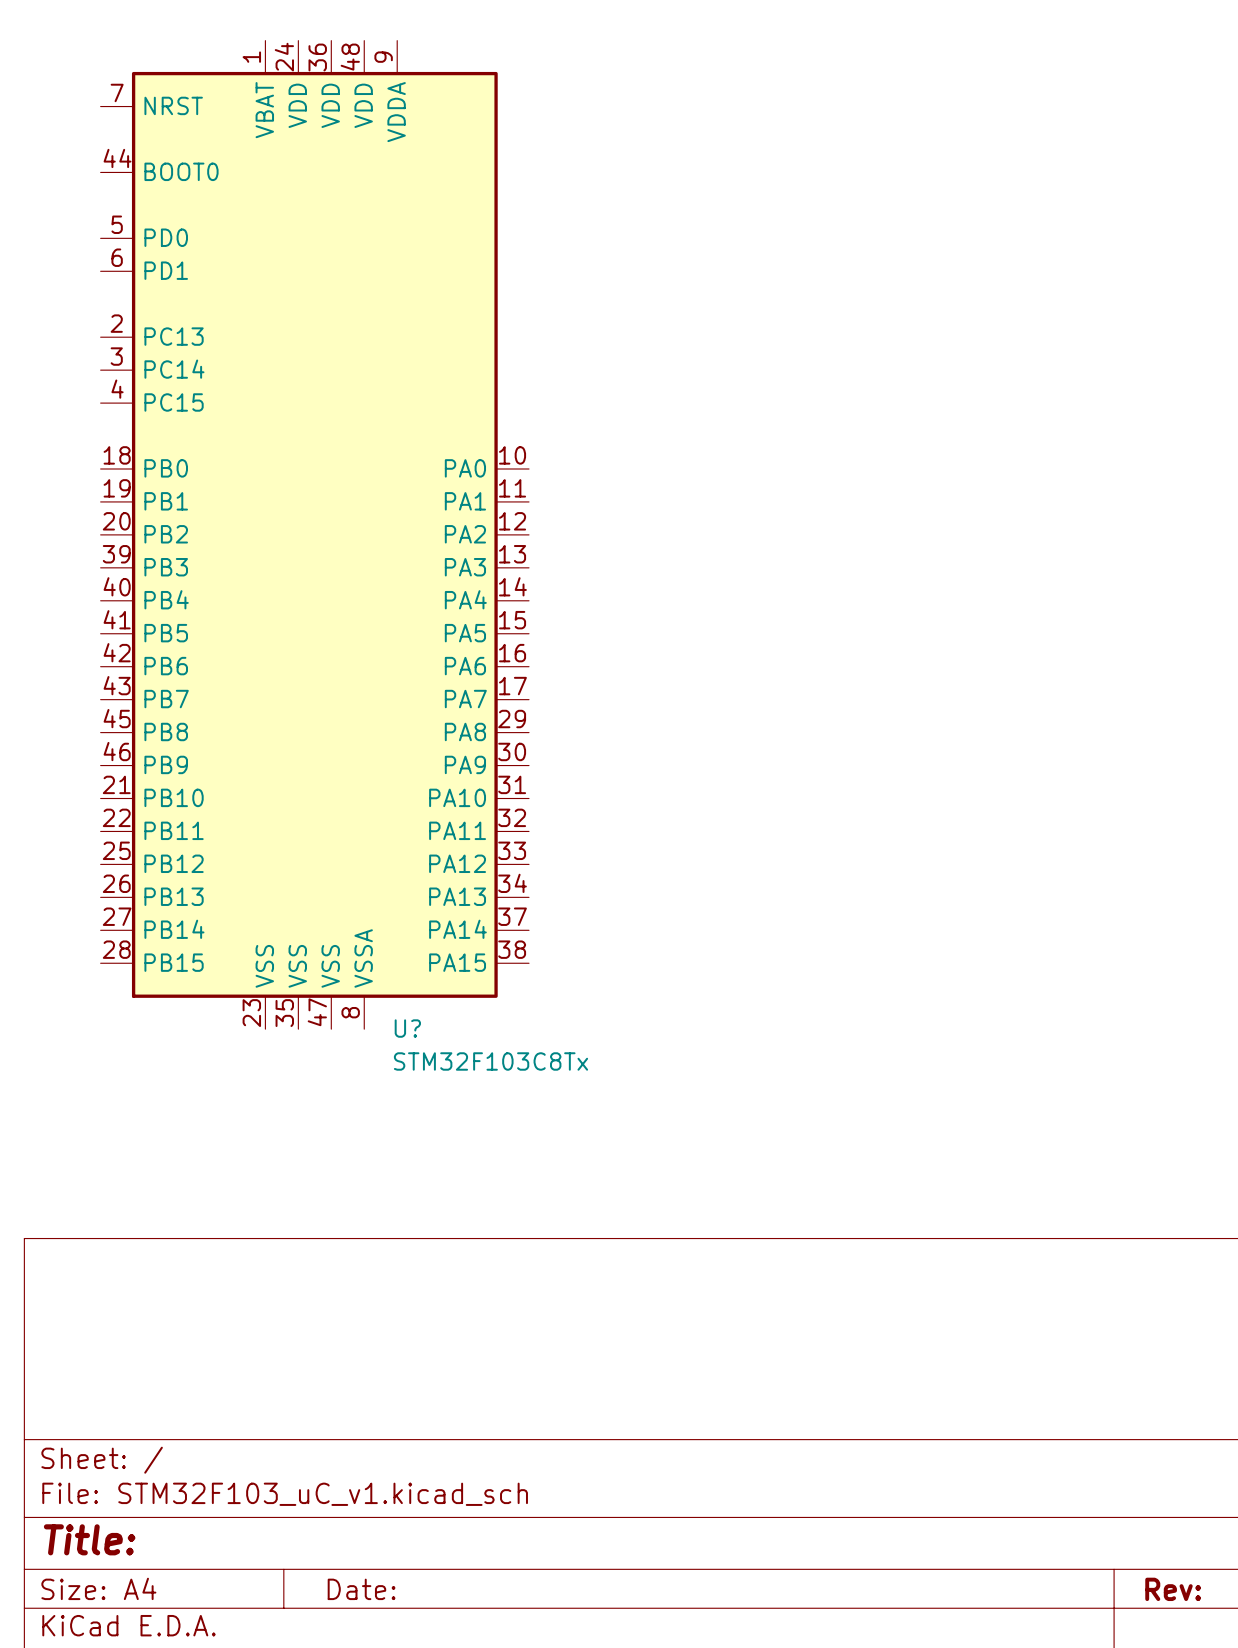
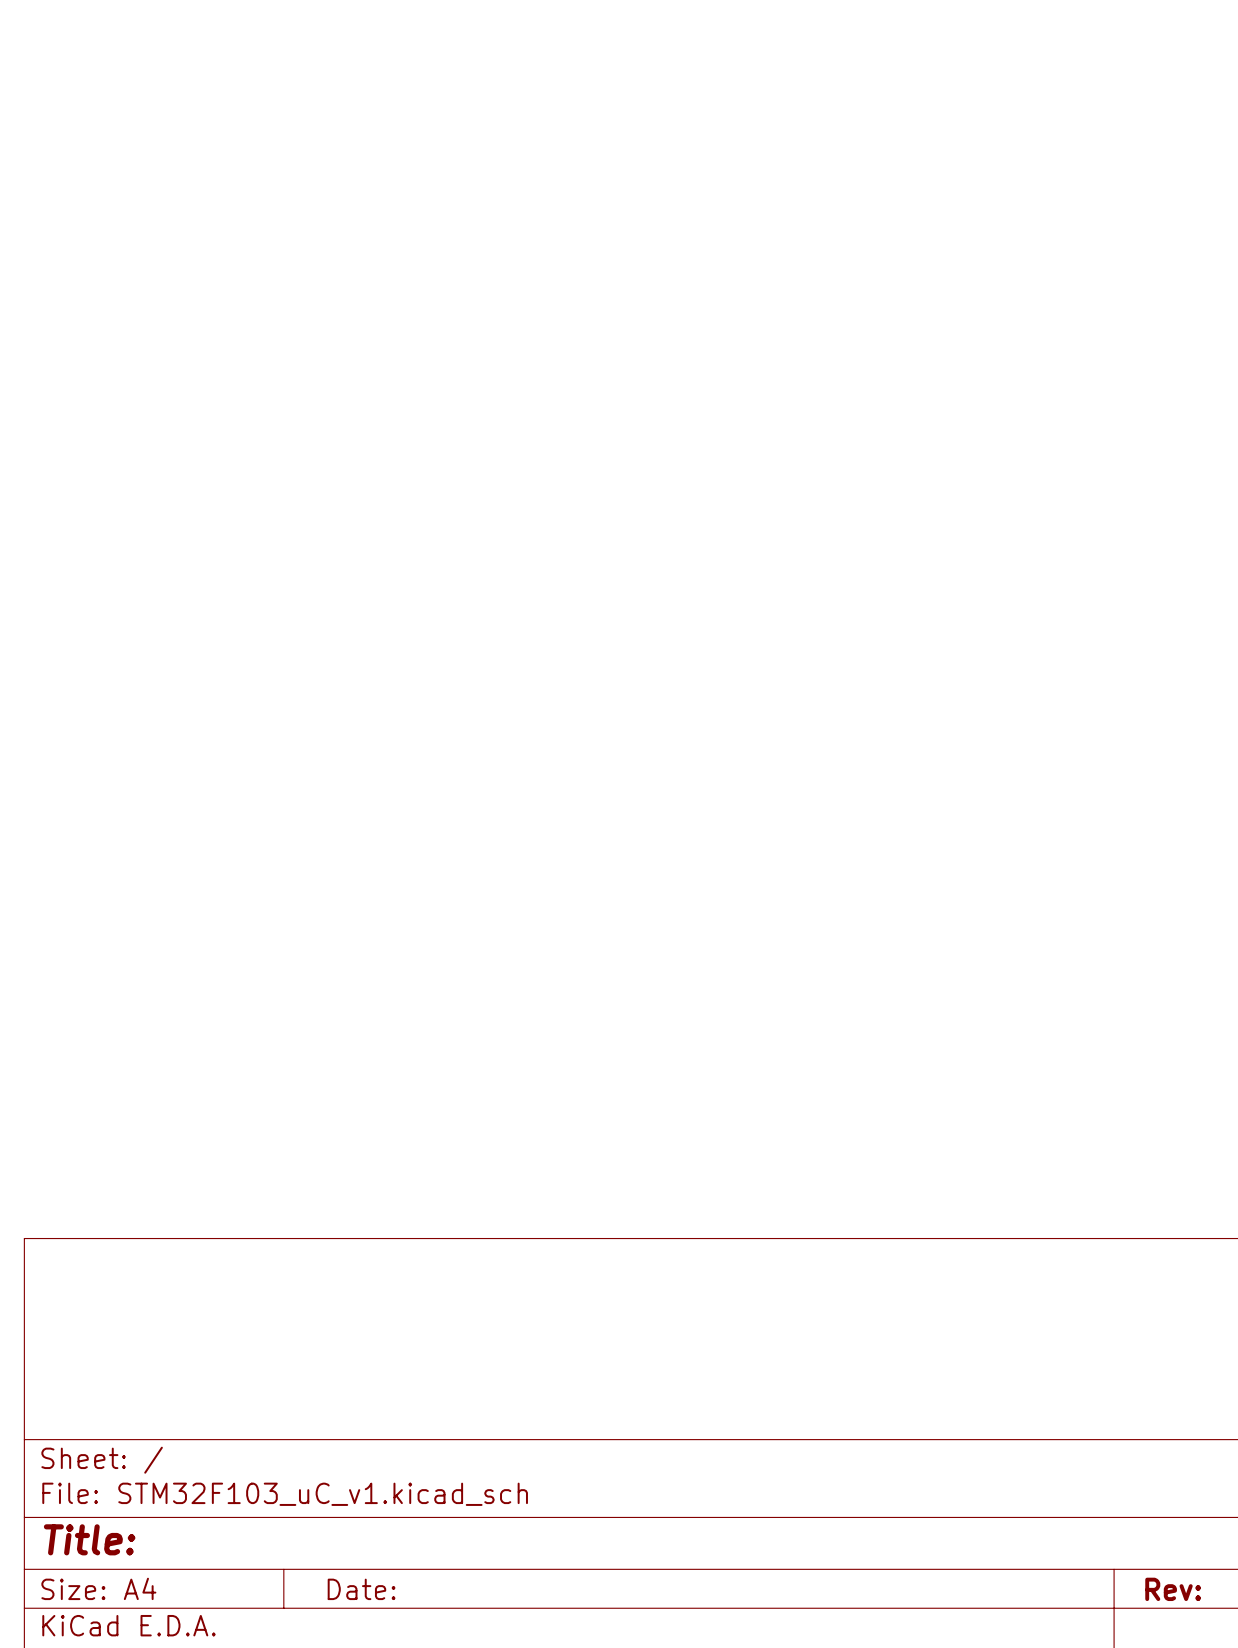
U?: STM32F103C8Tx (314, 534) -> none

